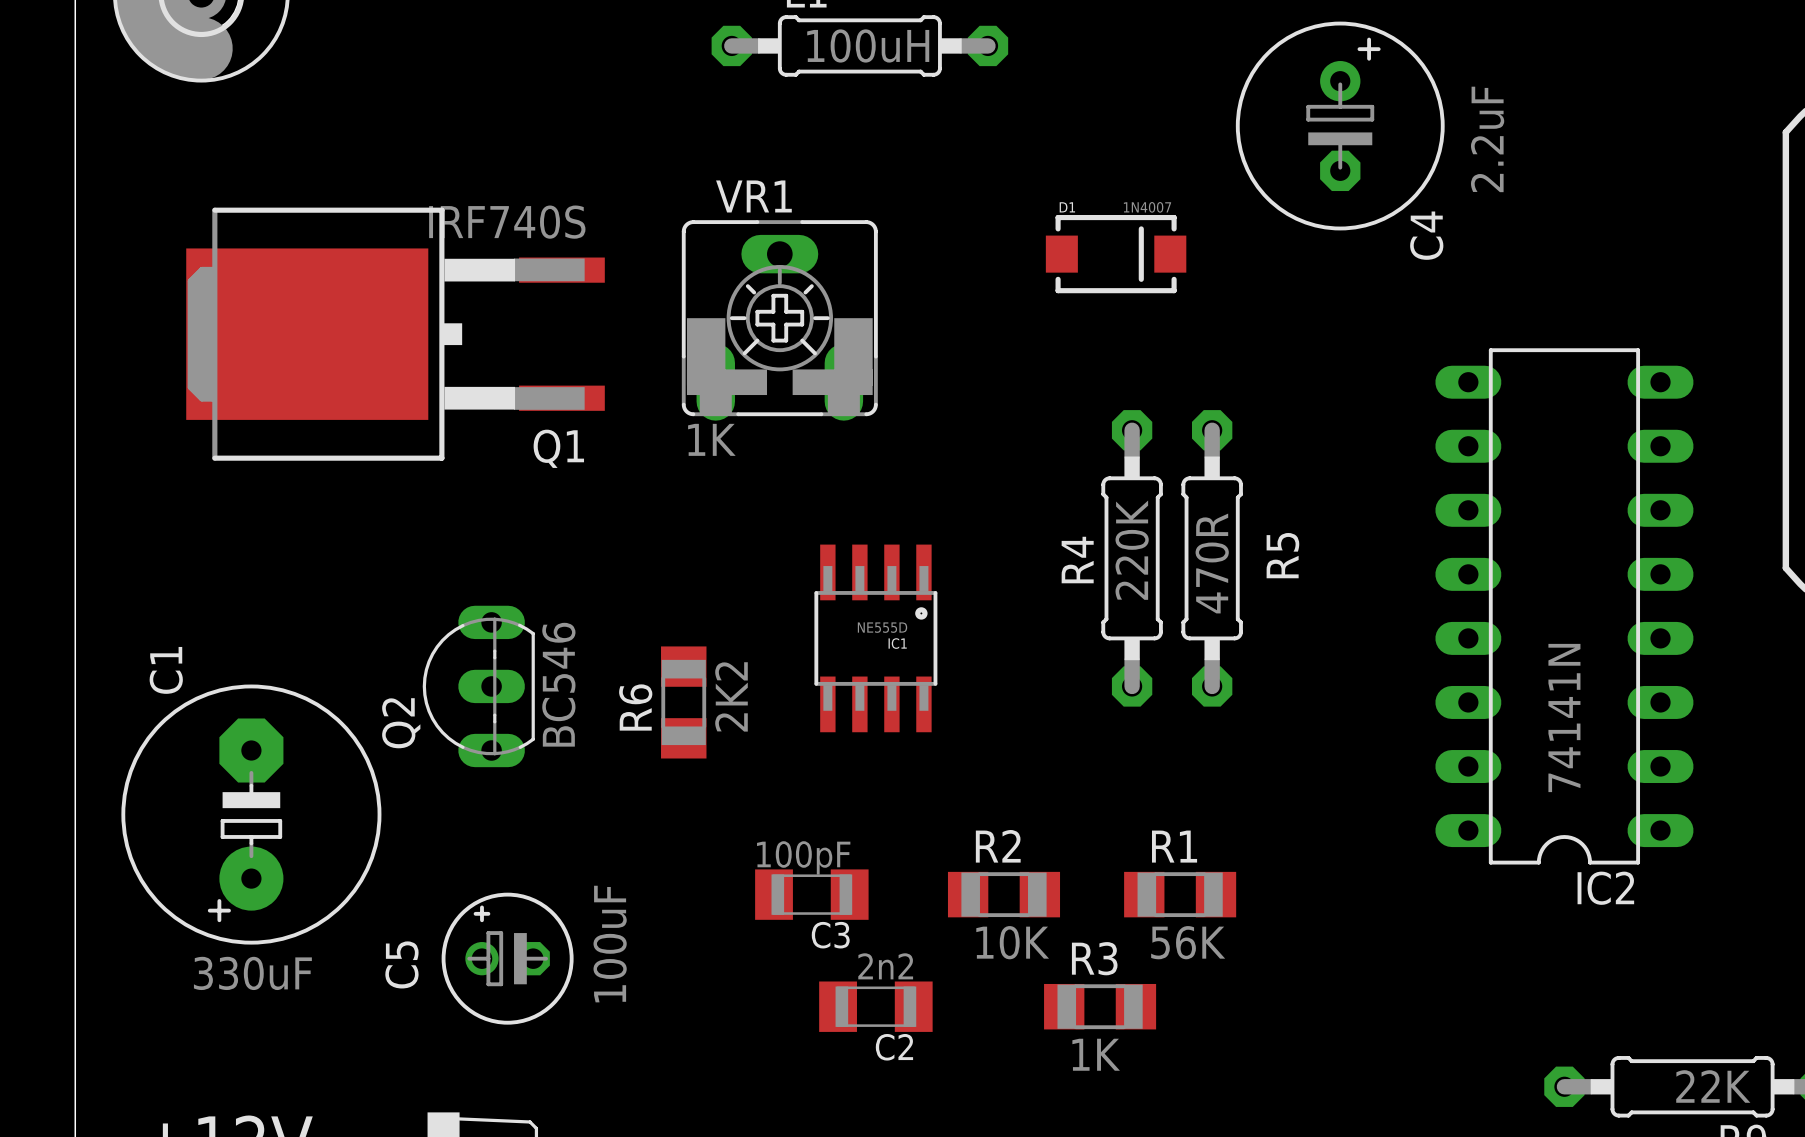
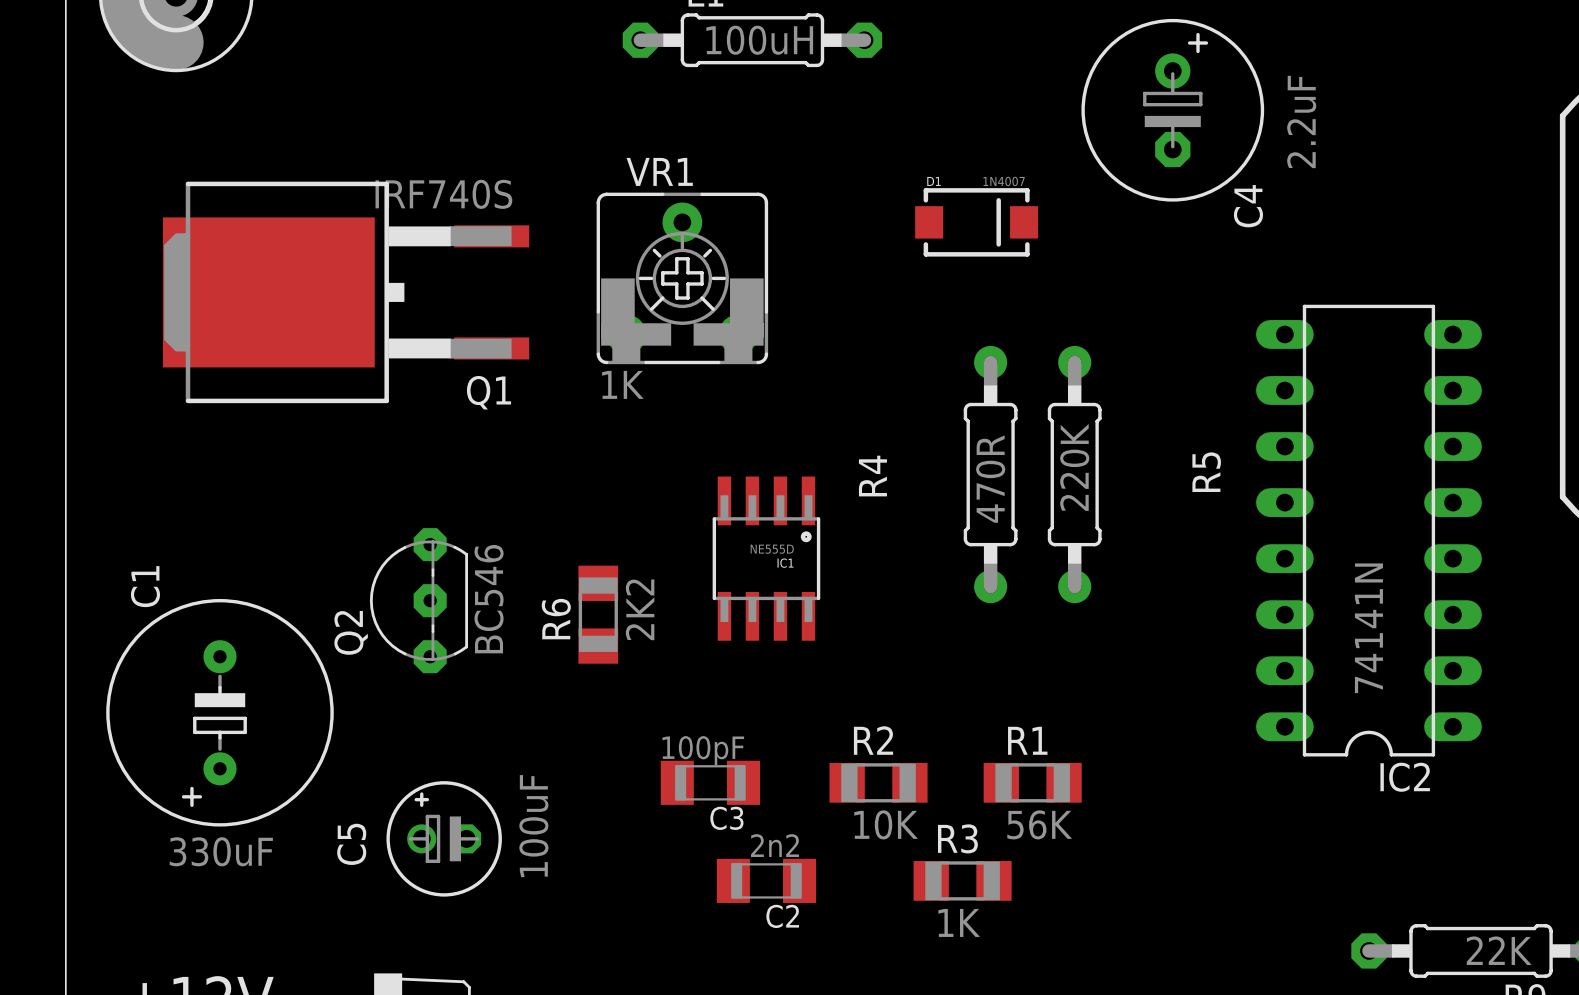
VR1 footprint: [681, 220, 878, 421] -> [596, 192, 769, 365]
R5 footprint: [1101, 410, 1163, 707] -> [1047, 345, 1102, 604]
R4 footprint: [1181, 410, 1243, 707] -> [963, 345, 1018, 604]
Q2 footprint: [422, 605, 535, 768] -> [369, 528, 469, 674]
C1 footprint: [121, 684, 382, 945] -> [106, 598, 334, 827]

